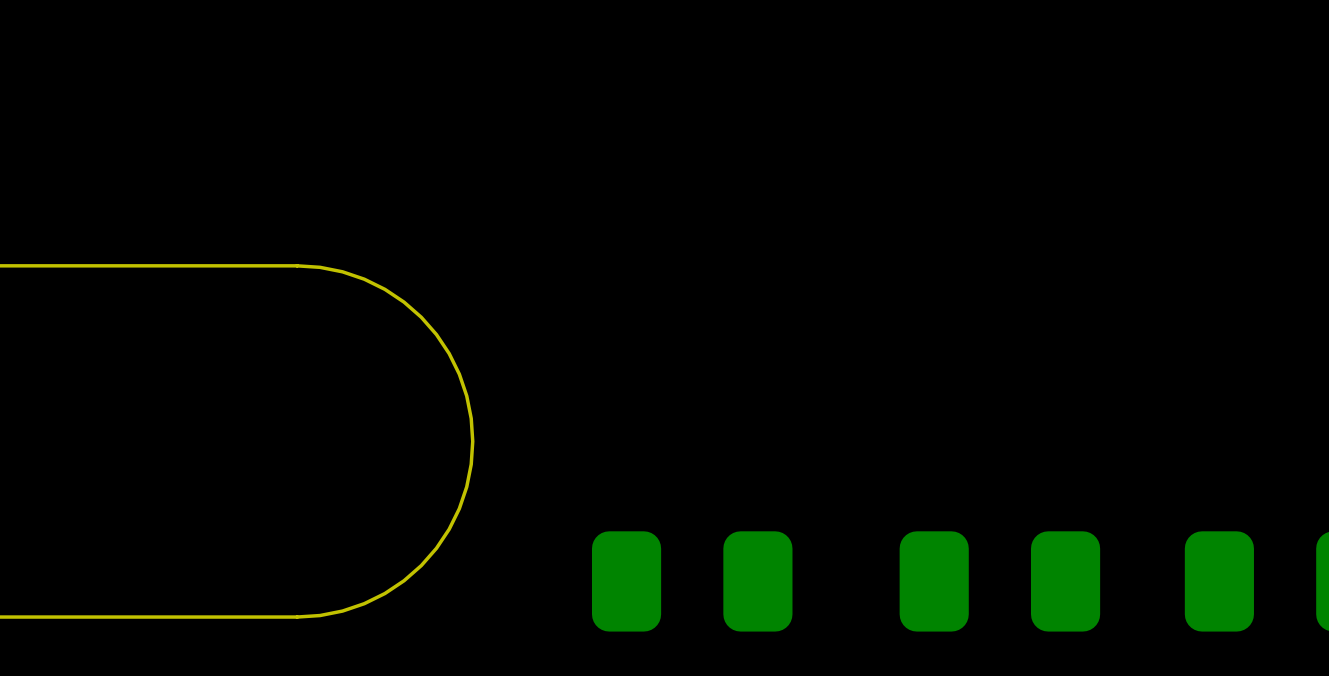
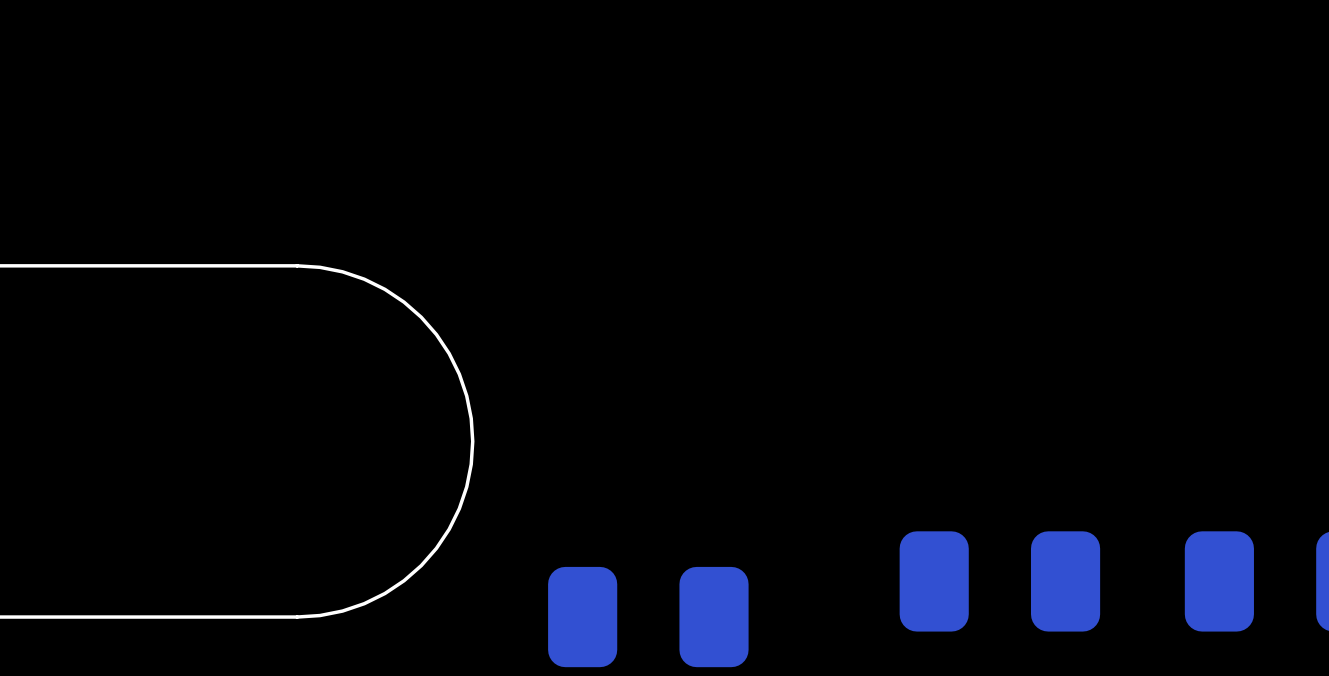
part position: (692, 581) -> (648, 617)

